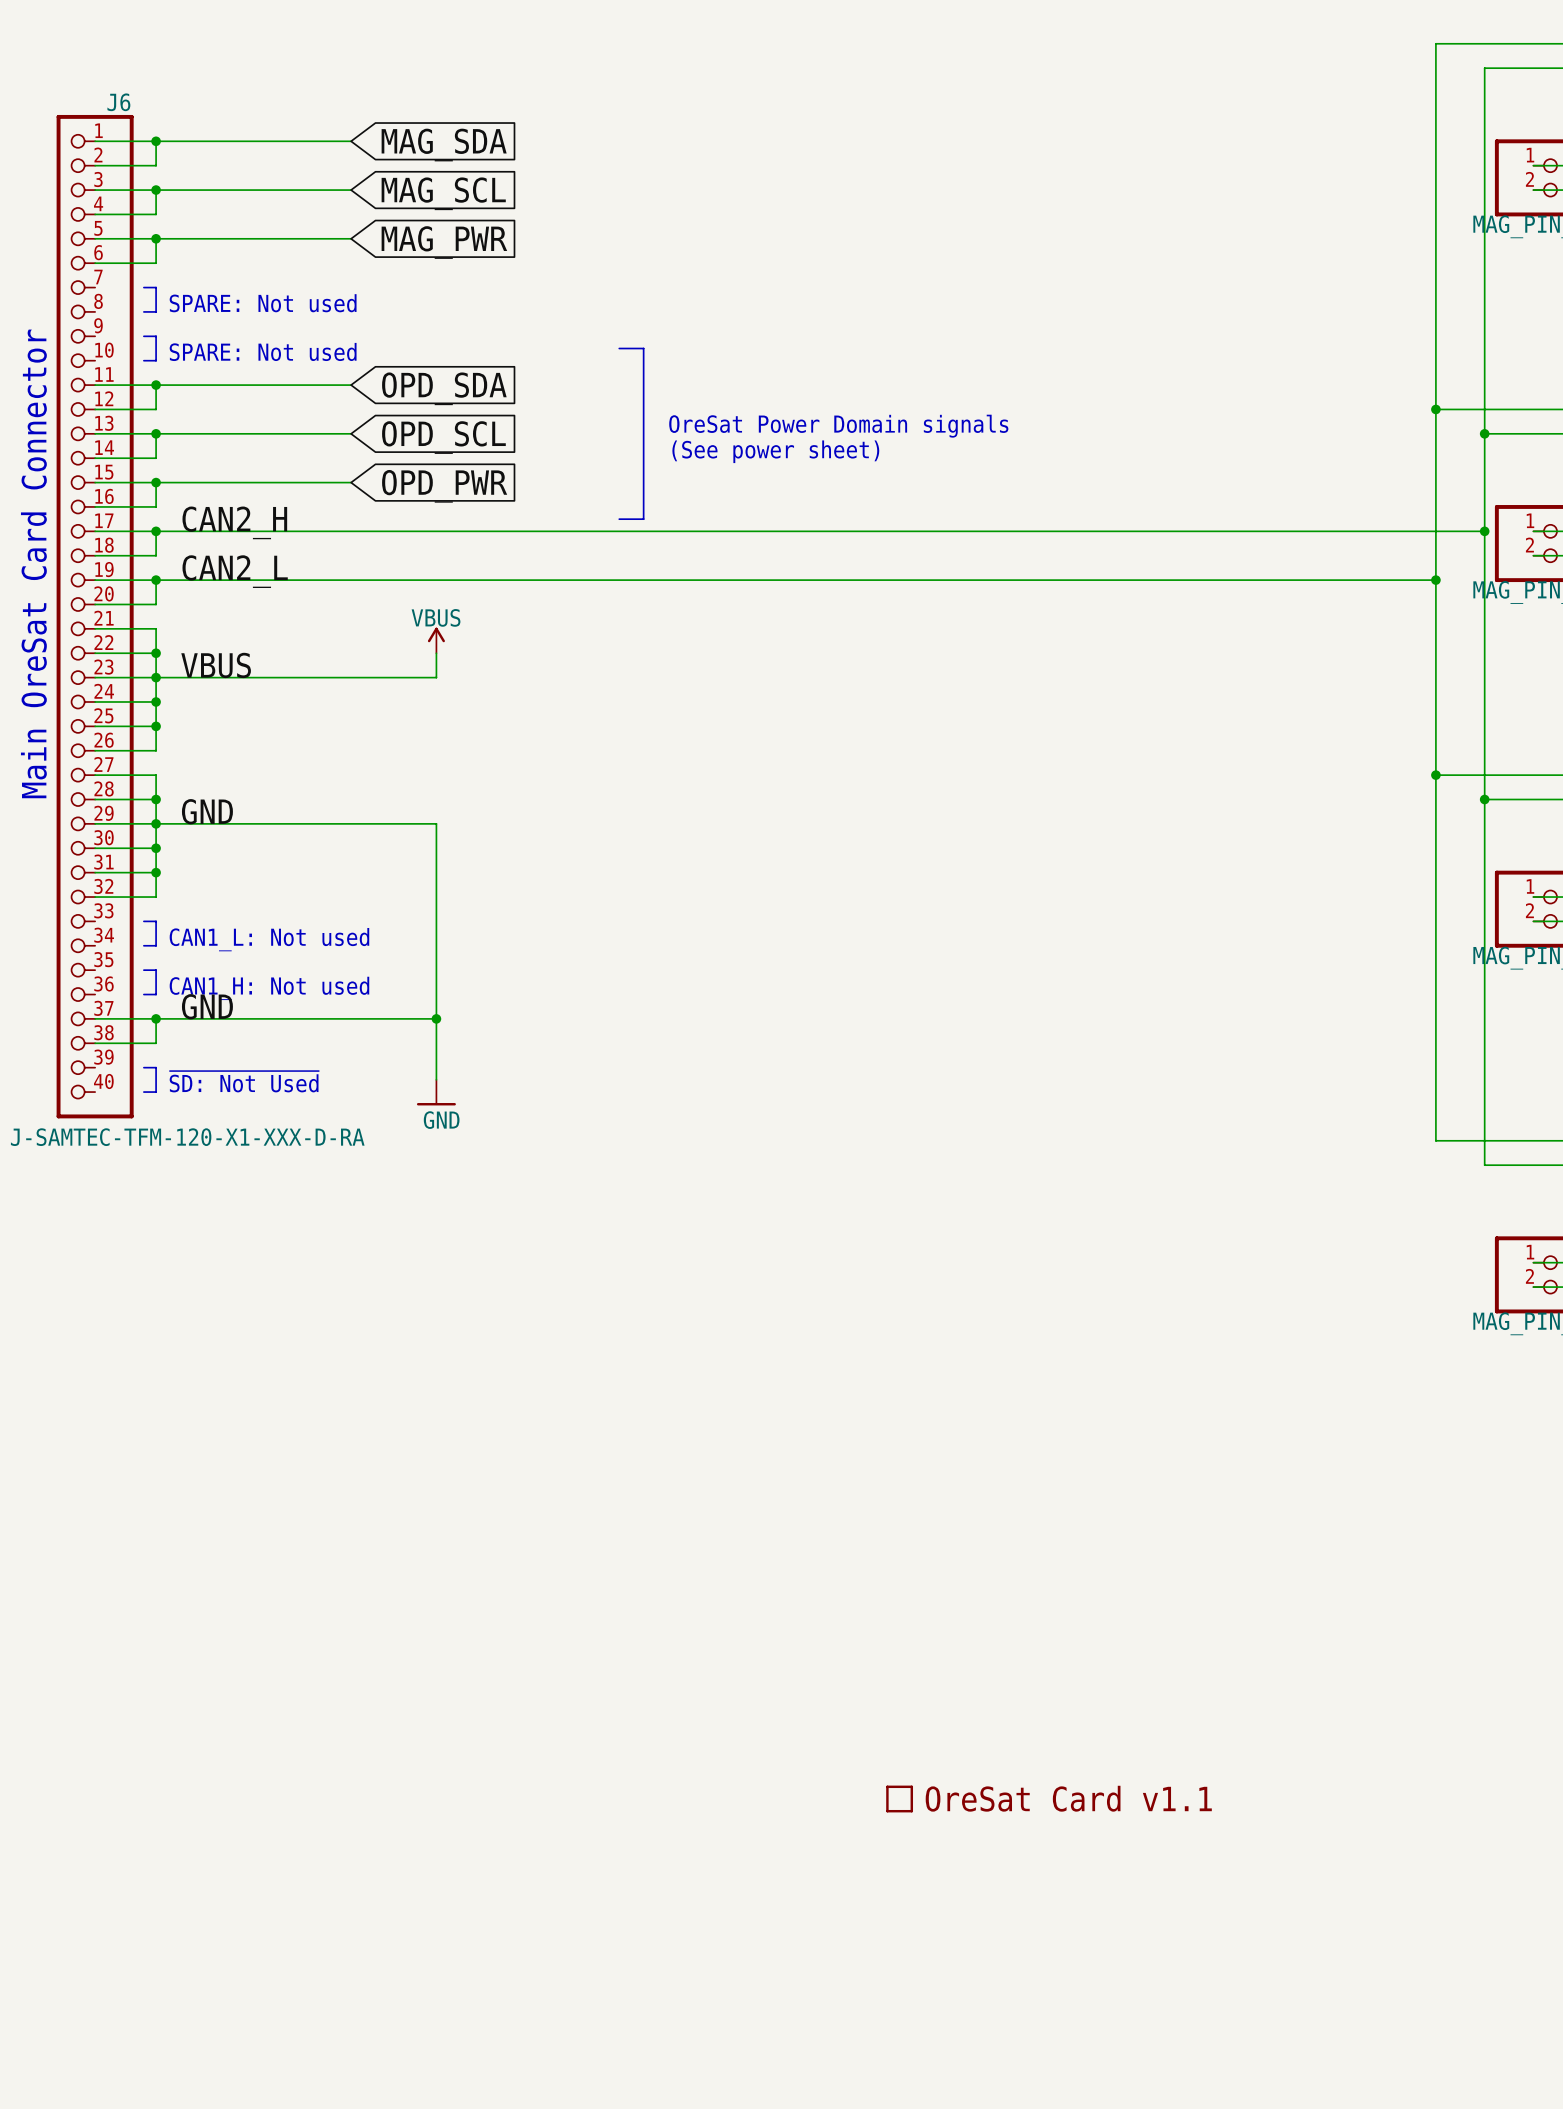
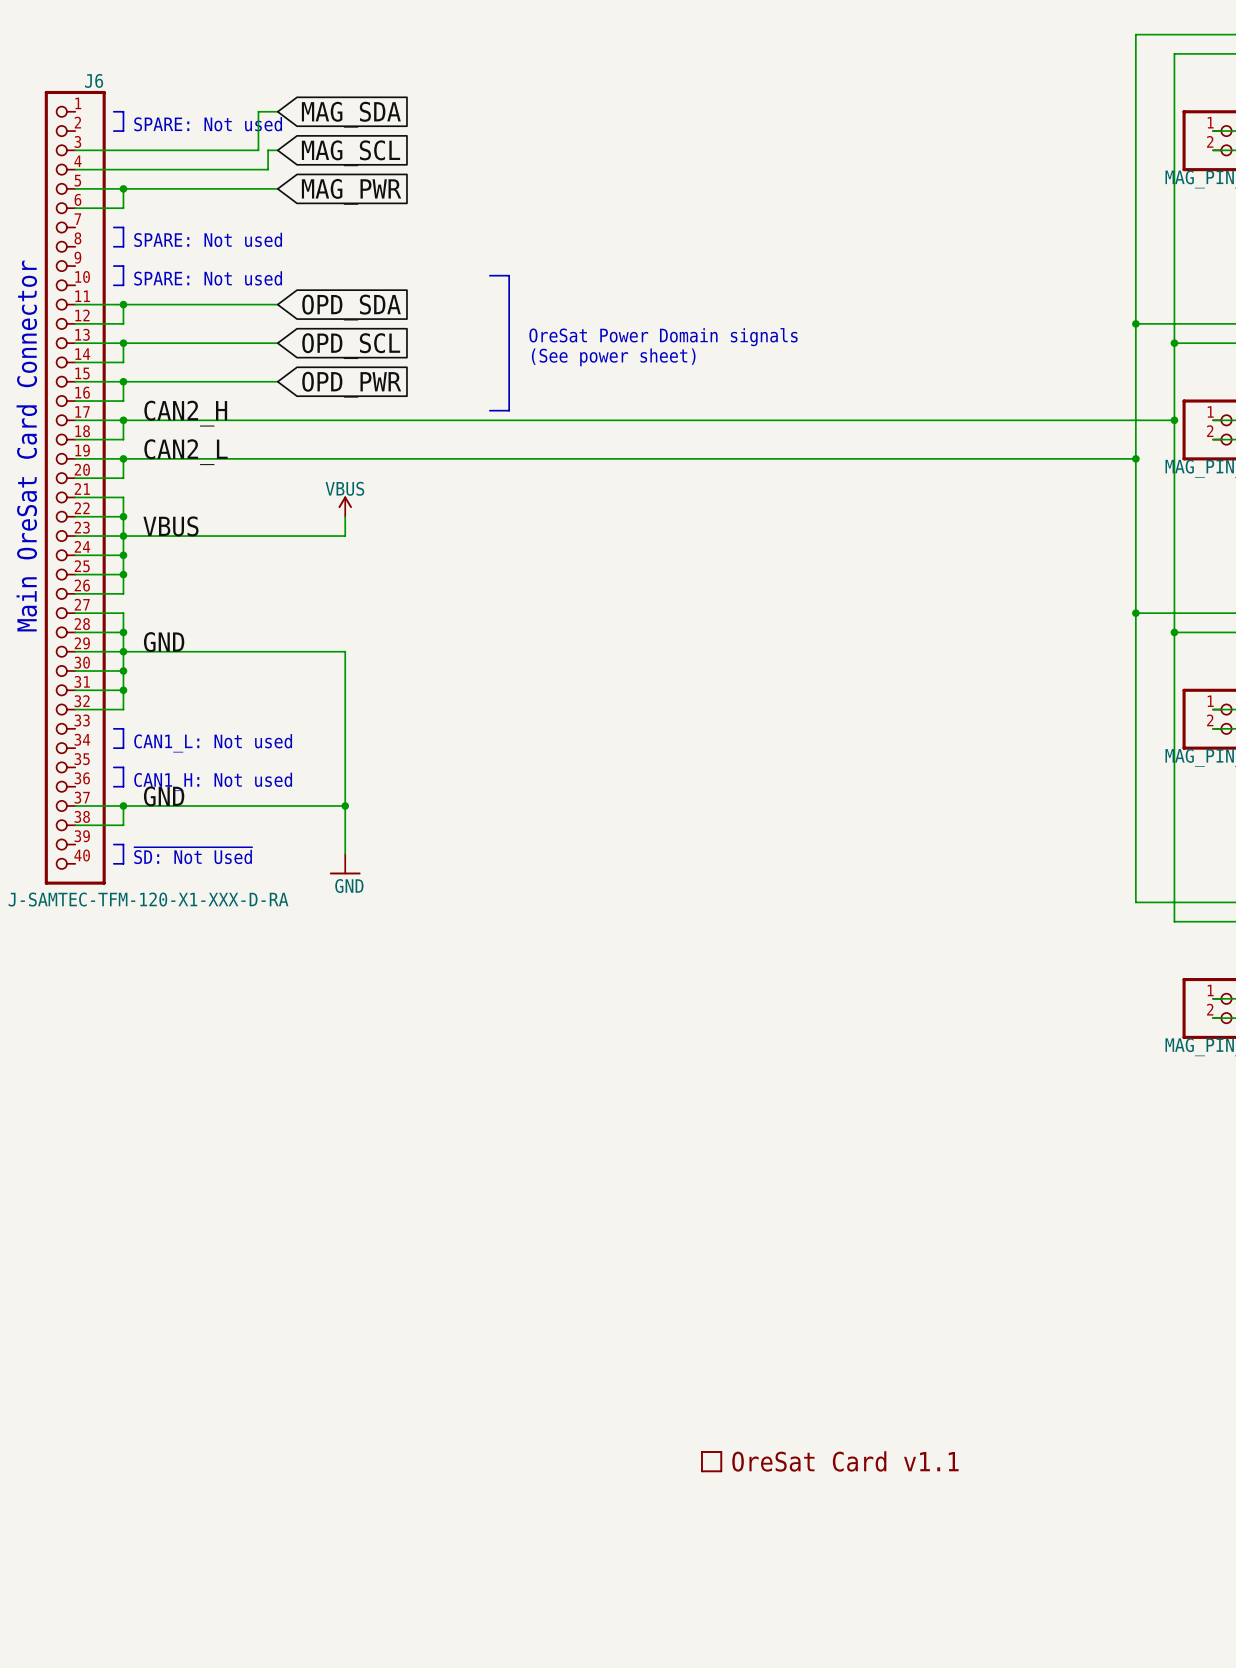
wire: (95, 141) (326, 141) -> none
line: none -> (113, 111) (123, 111) (123, 131) (113, 131)
wire: (156, 141) (156, 165) (95, 165) -> none
junction: (156, 141) -> none
text: none -> SPARE: Not used (208, 124)
wire: (156, 190) (156, 214) -> (268, 150) (268, 169) (123, 169)
junction: (156, 190) -> none
wire: (326, 190) (338, 190) -> (258, 150) (258, 111)
part position: (899, 1799) -> (711, 1461)

